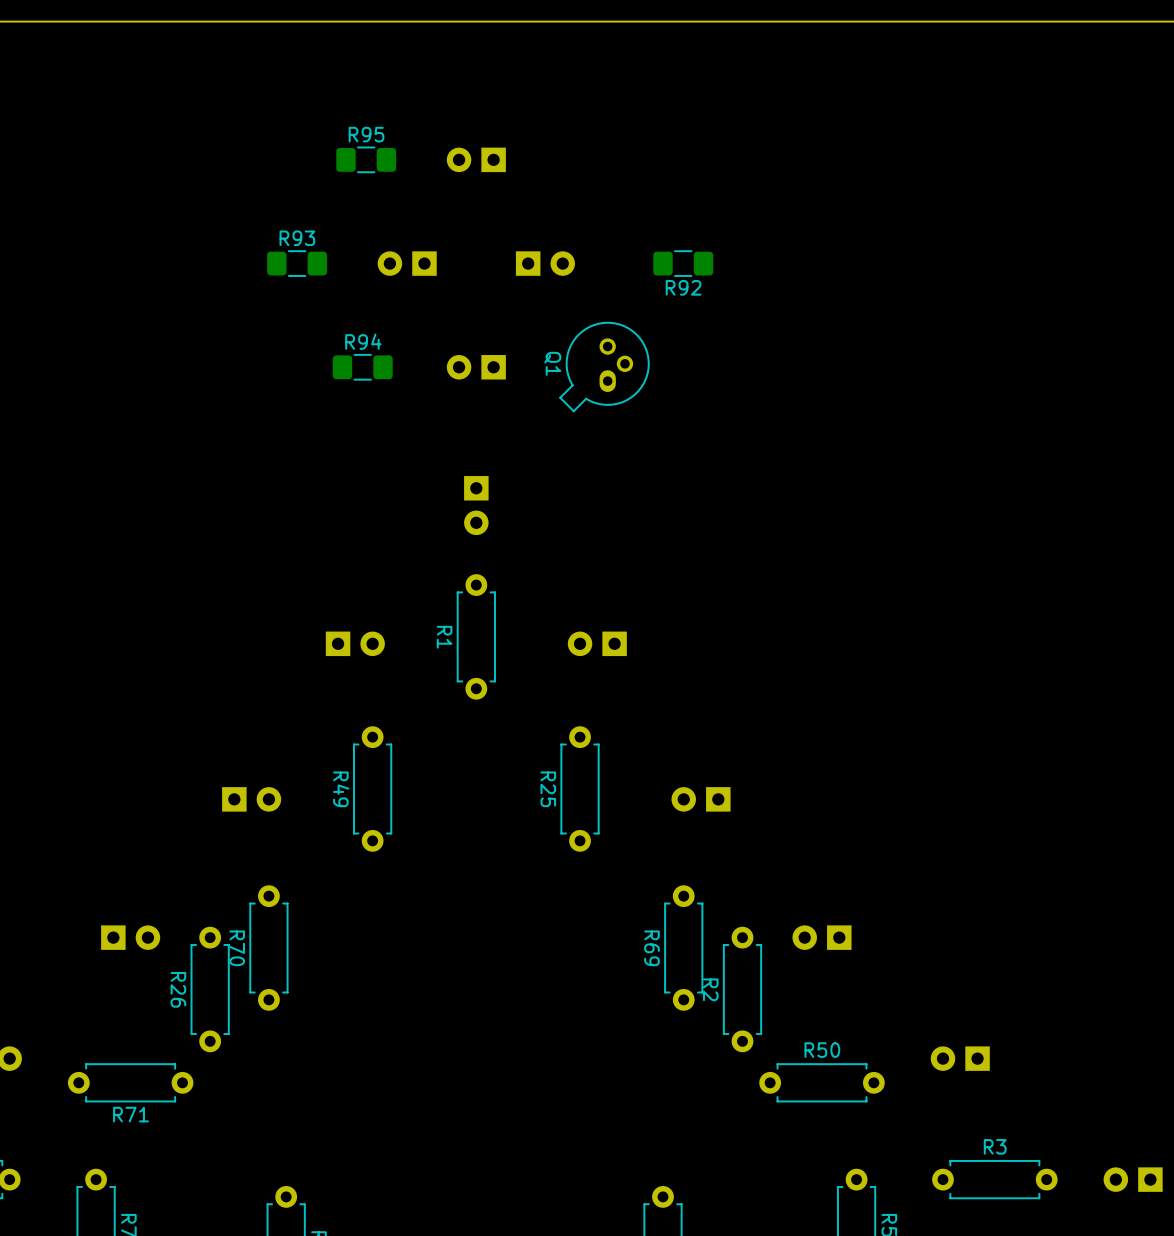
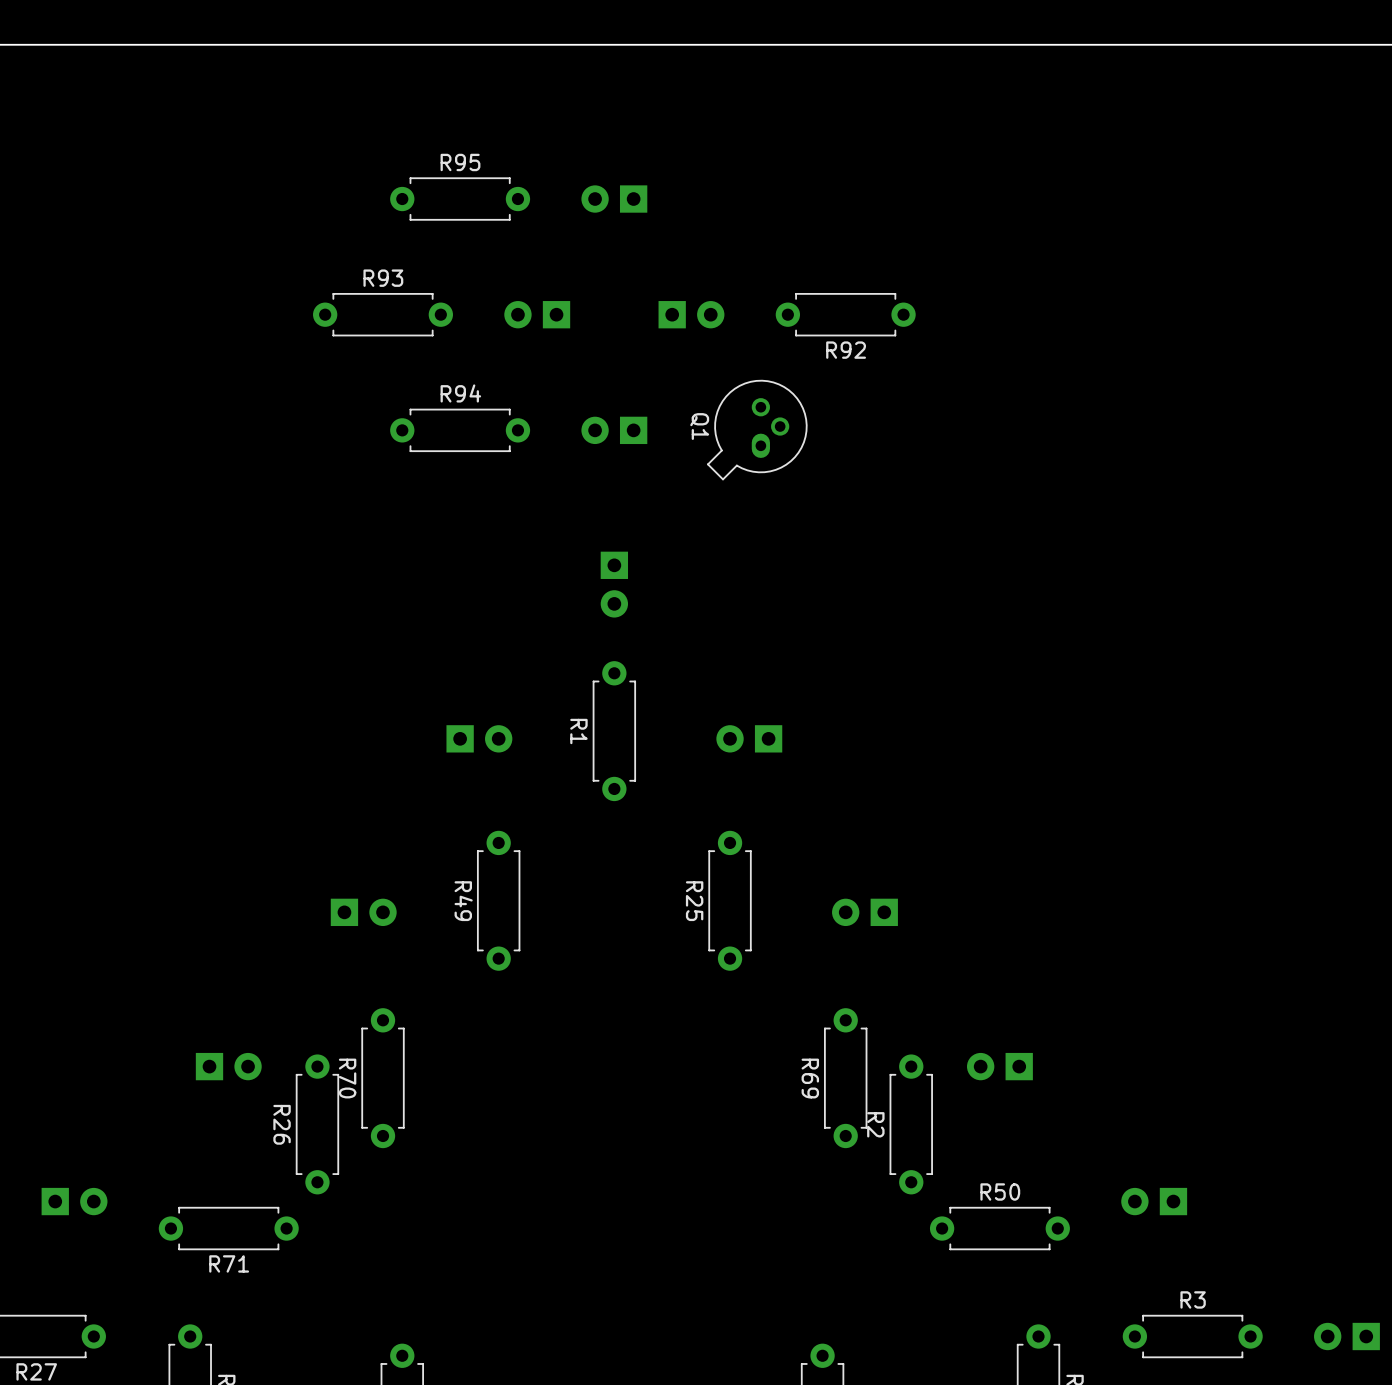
R95 footprint: [336, 146, 397, 174] -> [390, 177, 531, 221]
R93 footprint: [267, 250, 328, 277] -> [313, 292, 453, 337]
R92 footprint: [653, 250, 714, 277] -> [775, 292, 916, 337]
R94 footprint: [332, 354, 393, 381] -> [390, 408, 531, 453]

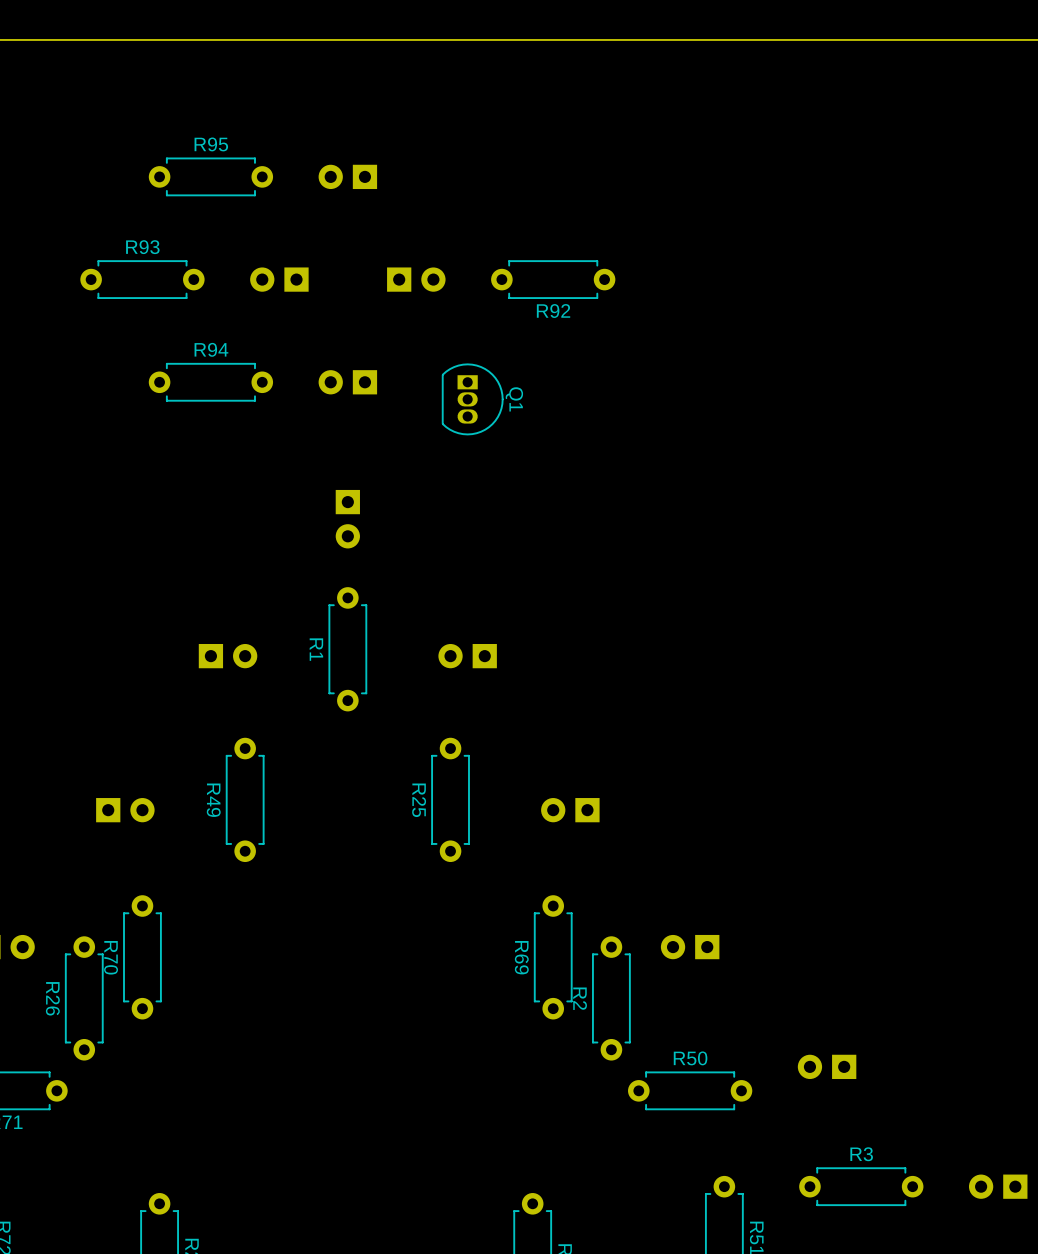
Q1 footprint: [707, 379, 808, 481] -> [441, 363, 504, 436]
Q1 name position: Q1 (699, 426) -> Q1 (514, 399)

